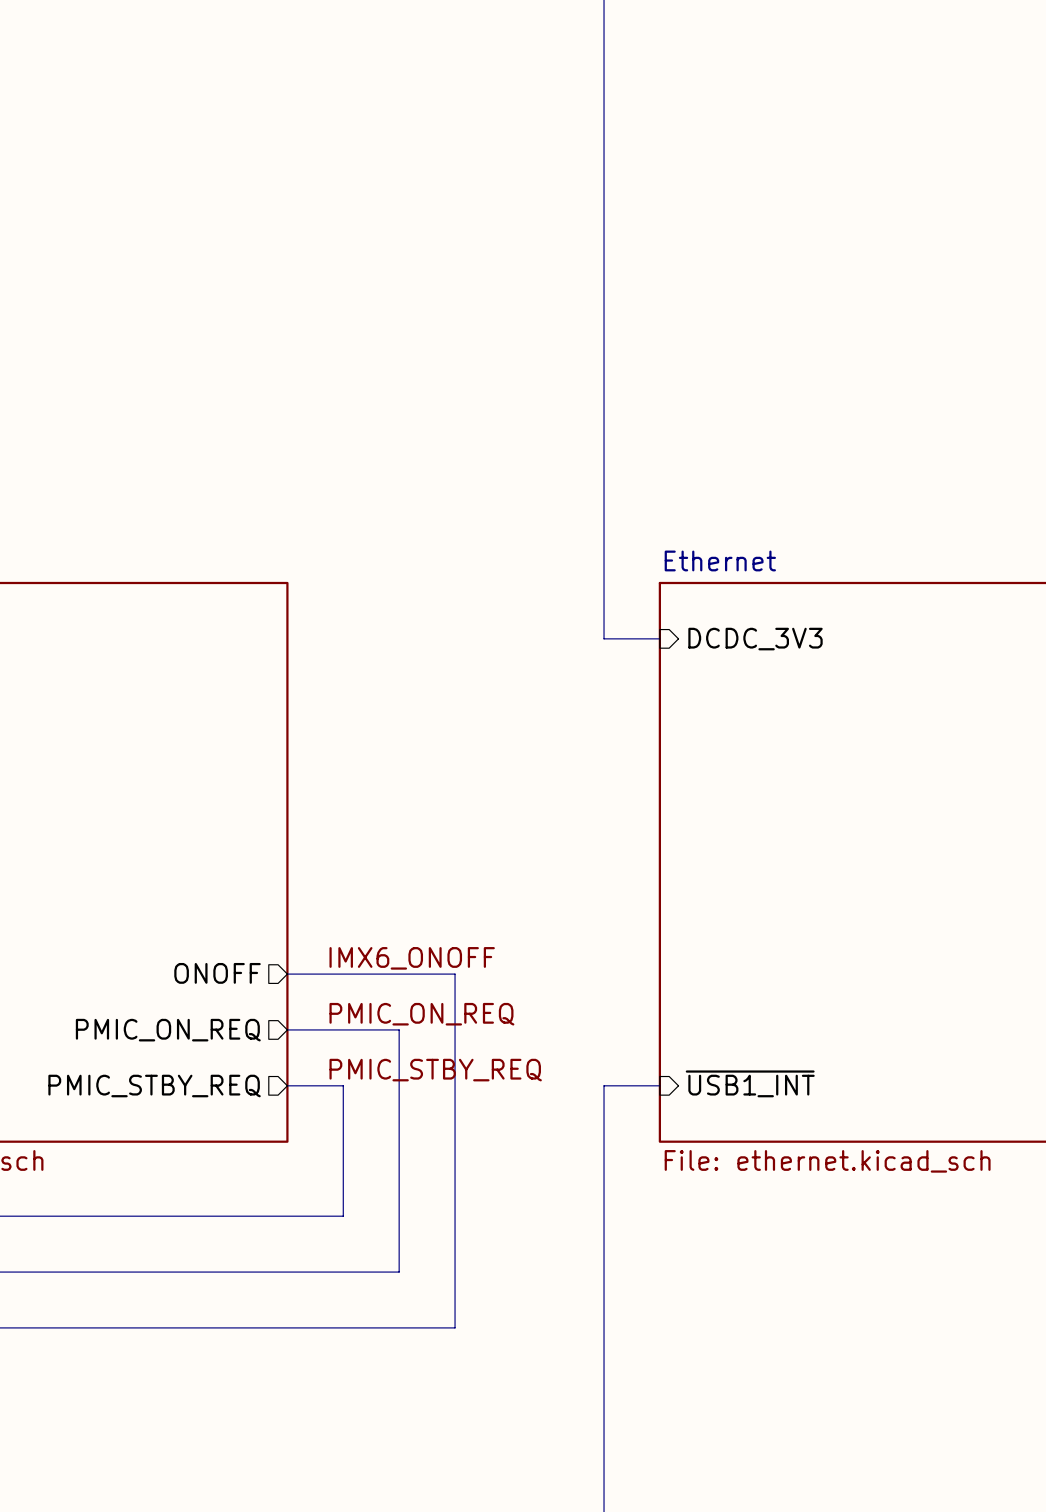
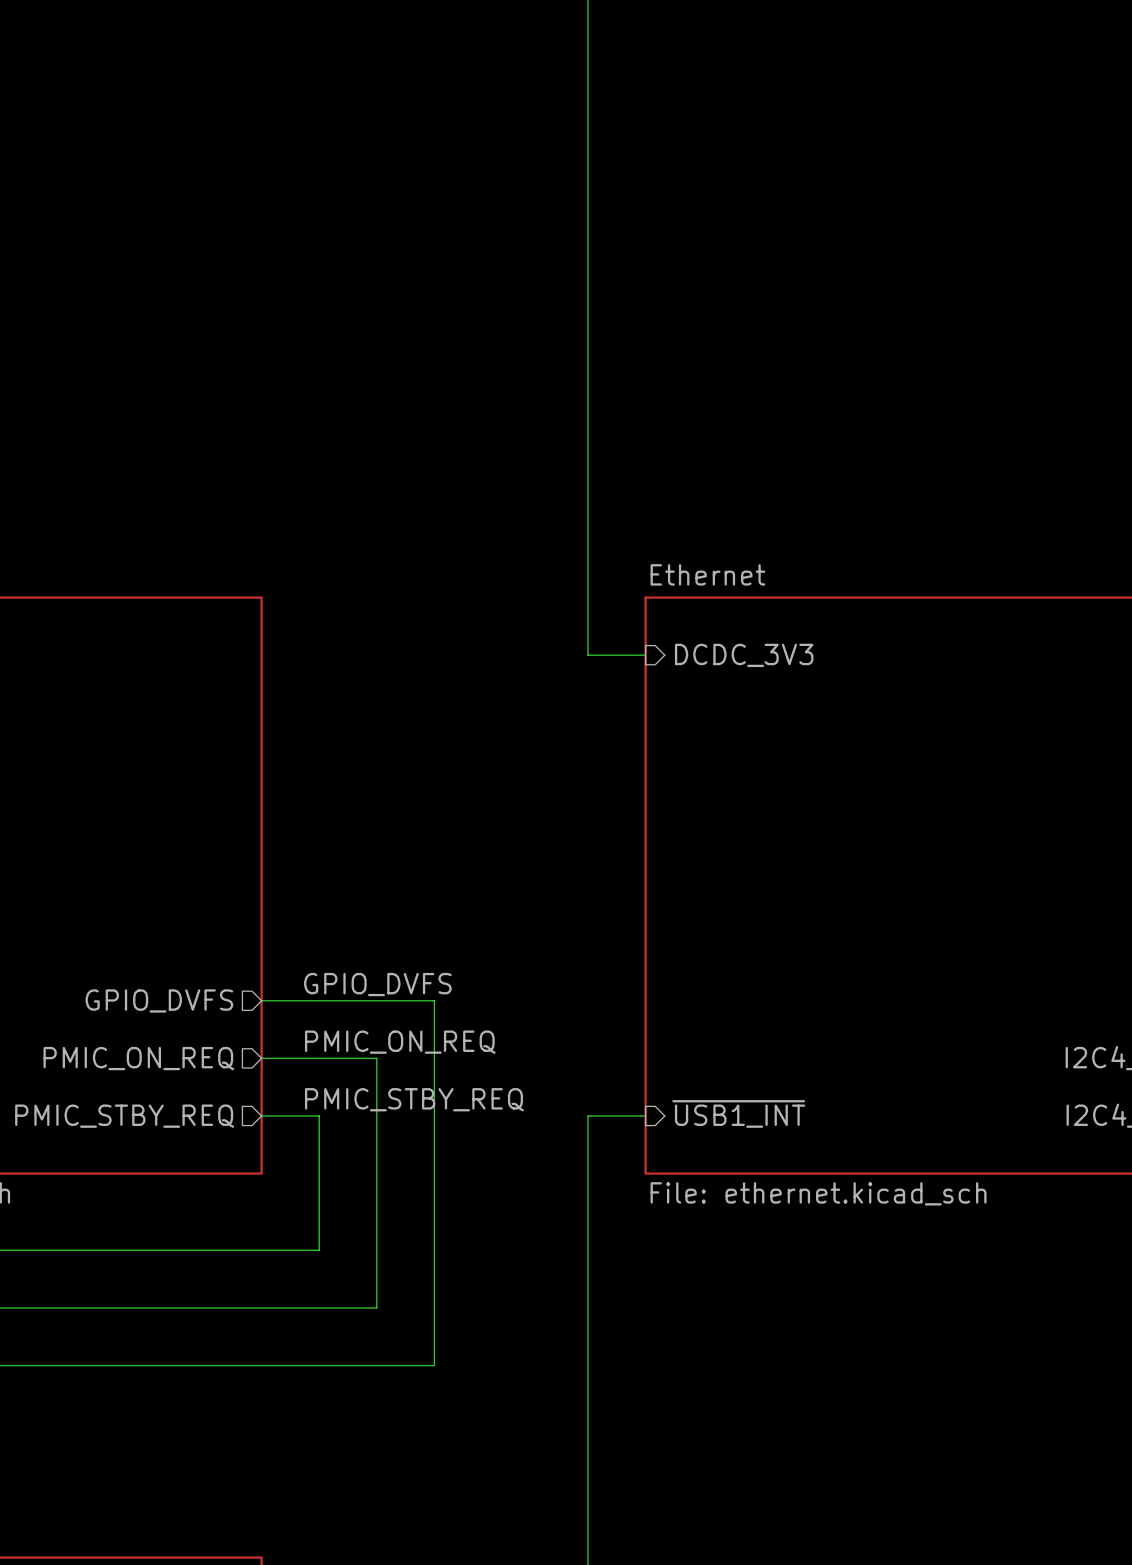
label: IMX6_ONOFF (412, 958) -> GPIO_DVFS (377, 984)
sheet pin: ONOFF (217, 973) -> GPIO_DVFS (159, 1000)

